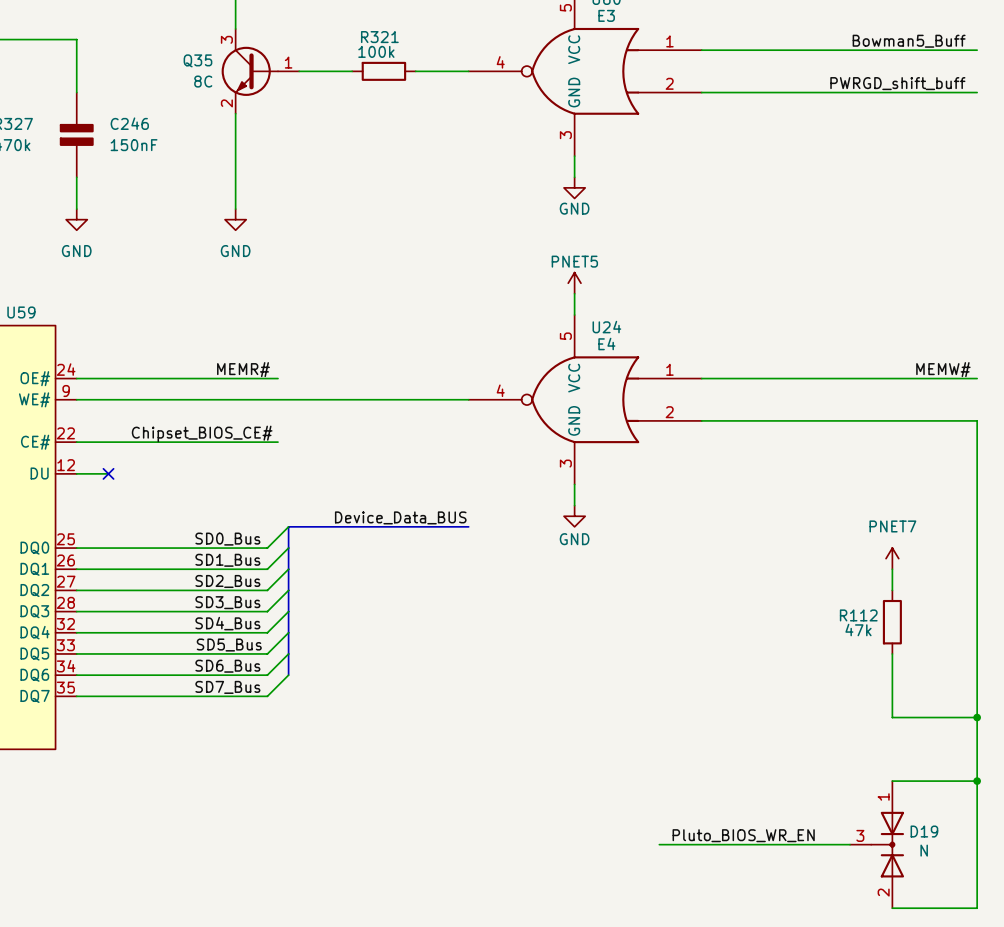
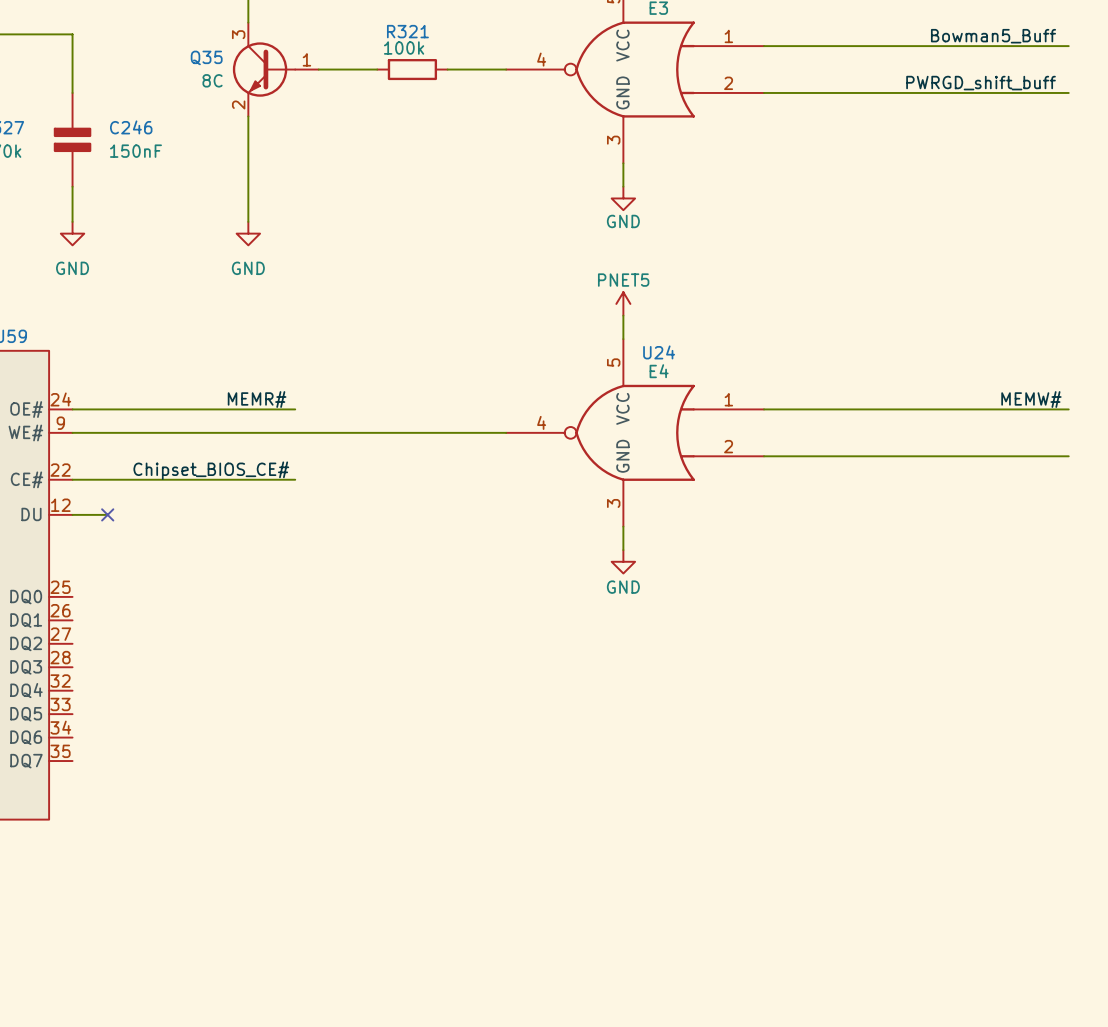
wire: (977, 420) (977, 908) (892, 908) -> none
label: Device_Data_BUS (400, 517) -> none
wire: (288, 526) (267, 548) (76, 548) -> none
bus: (468, 526) (288, 526) (288, 675) -> none
label: SD0_Bus (227, 539) -> none
wire: (288, 548) (267, 569) (76, 569) -> none
power symbol: PNET7 (892, 558) -> none
label: SD1_Bus (227, 560) -> none
wire: (288, 569) (267, 590) (76, 590) -> none
wire: (892, 569) (892, 590) -> none
label: SD2_Bus (227, 581) -> none
wire: (288, 590) (267, 611) (76, 611) -> none
label: SD3_Bus (227, 602) -> none
wire: (288, 611) (267, 632) (76, 632) -> none
R112: 47k (892, 622) -> none
label: SD4_Bus (227, 623) -> none
wire: (288, 632) (267, 653) (76, 653) -> none
label: SD5_Bus (229, 645) -> none
wire: (288, 653) (267, 675) (76, 675) -> none
wire: (892, 653) (892, 717) (977, 717) -> none
label: SD6_Bus (227, 666) -> none
wire: (288, 675) (267, 696) (76, 696) -> none
label: SD7_Bus (227, 687) -> none
junction: (977, 717) -> none
wire: (892, 781) (977, 781) -> none
junction: (977, 781) -> none
label: Pluto_BIOS_WR_EN (743, 835) -> none
wire: (659, 844) (850, 844) -> none
D19: N (877, 844) -> none

